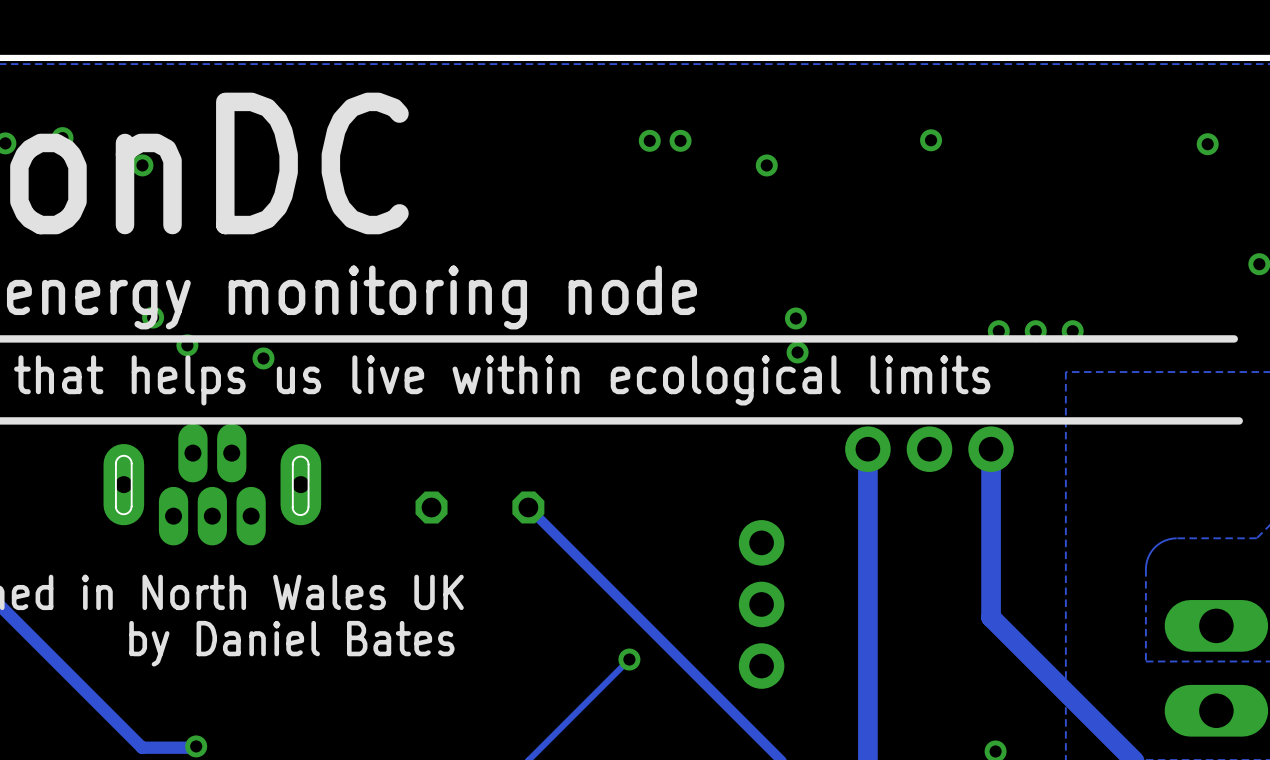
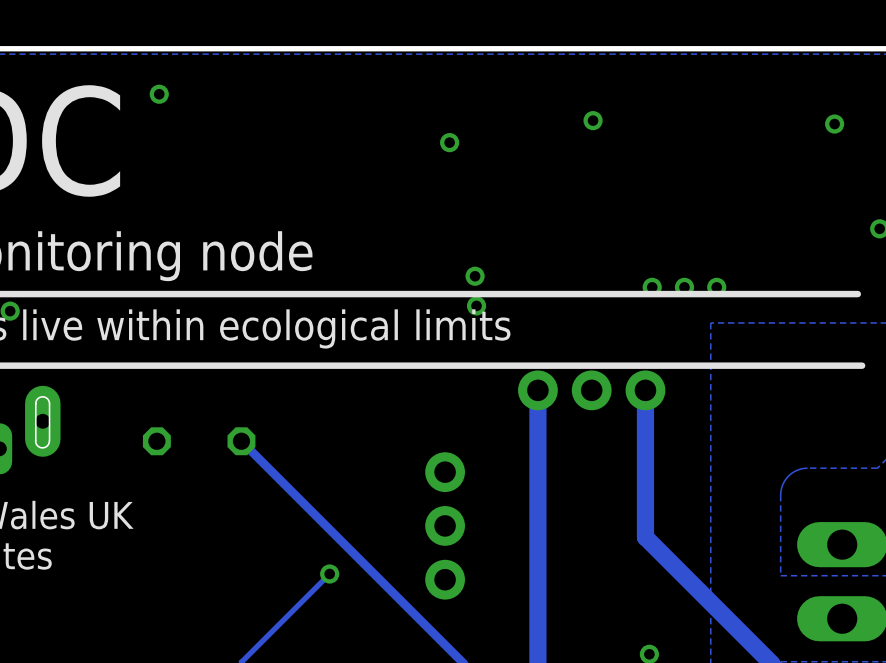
via: none -> (159, 94)
via: (649, 140) -> none
via: (680, 140) -> none

